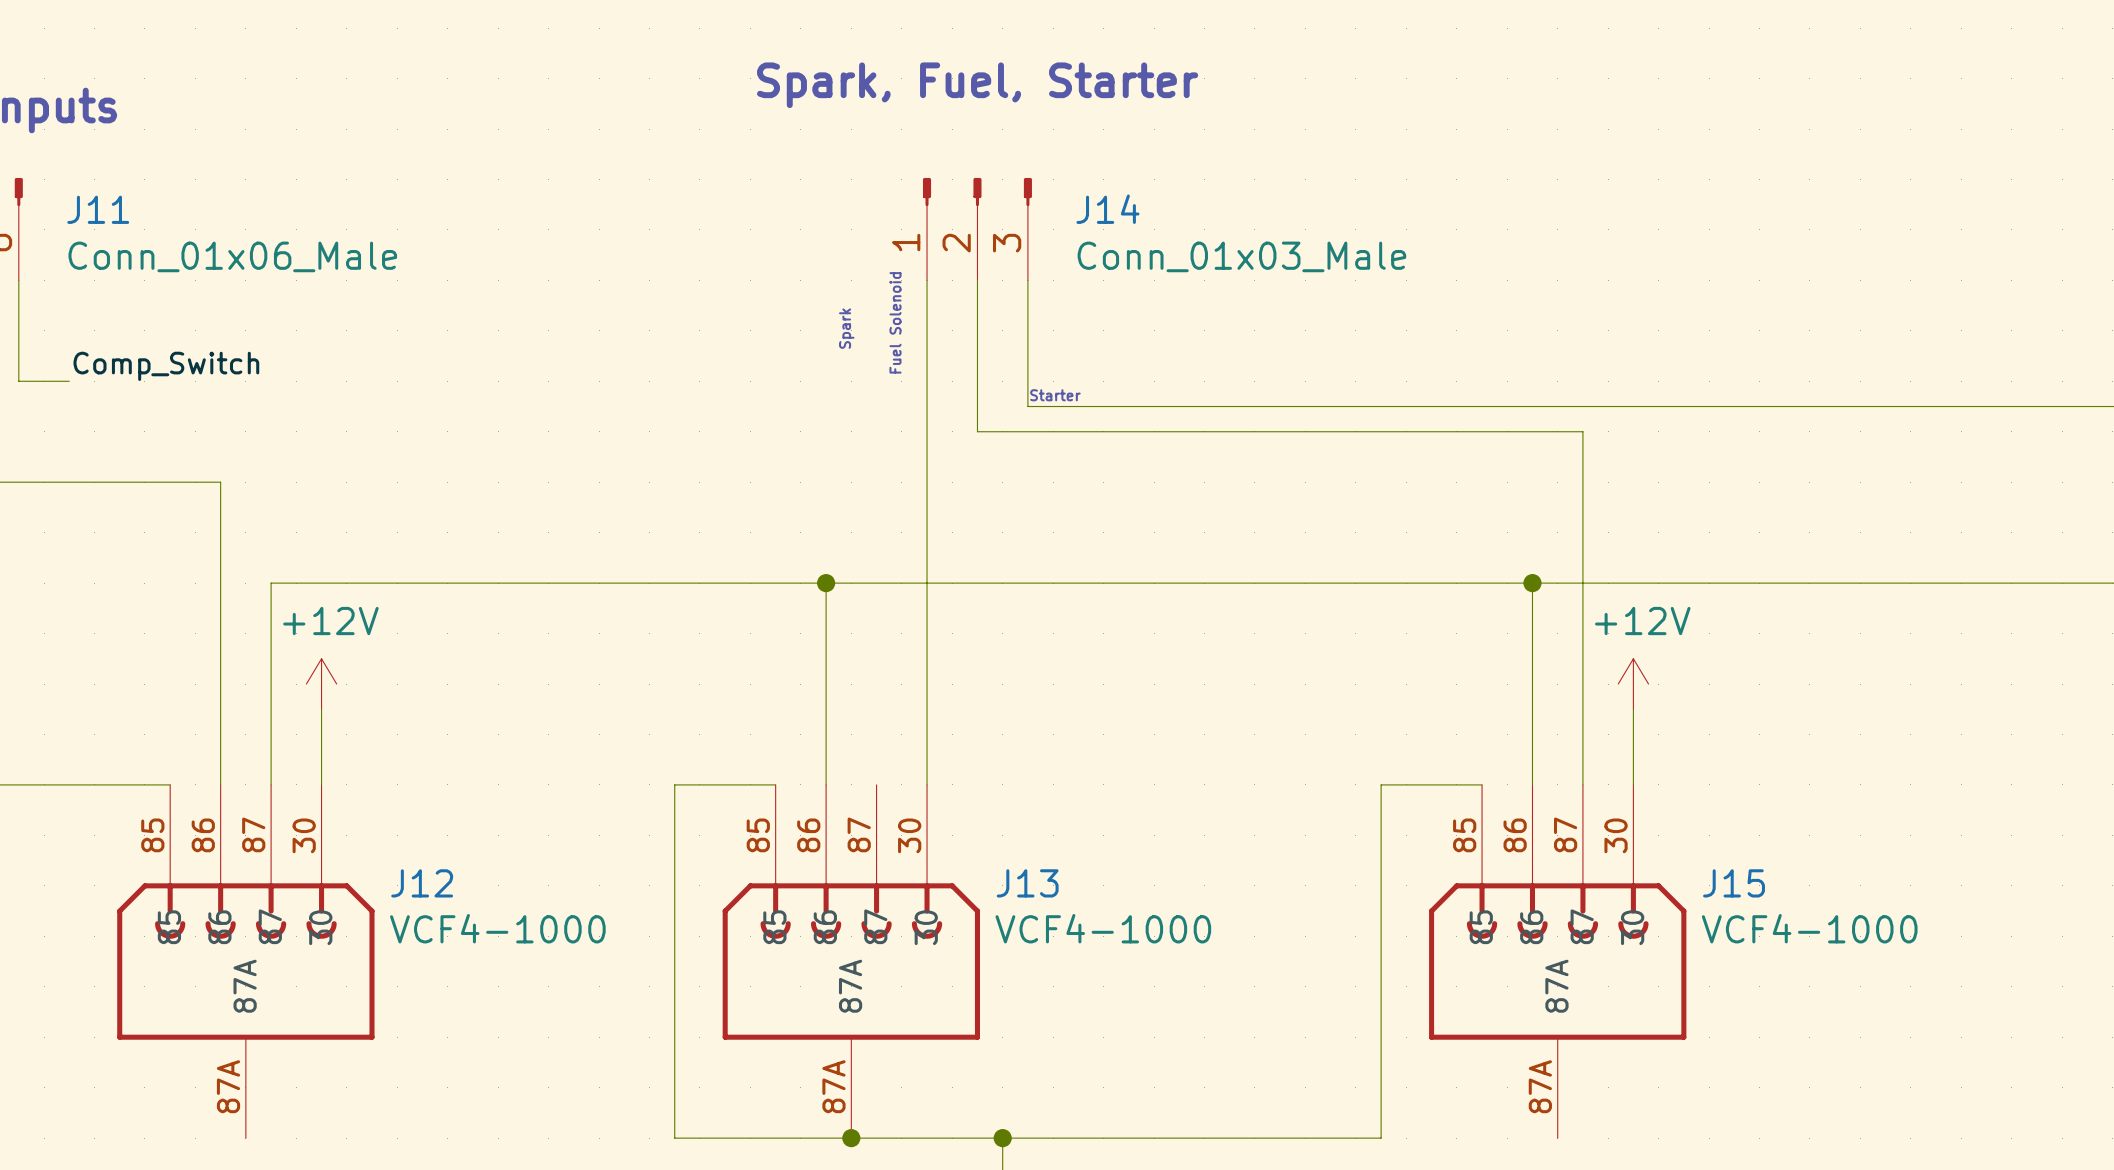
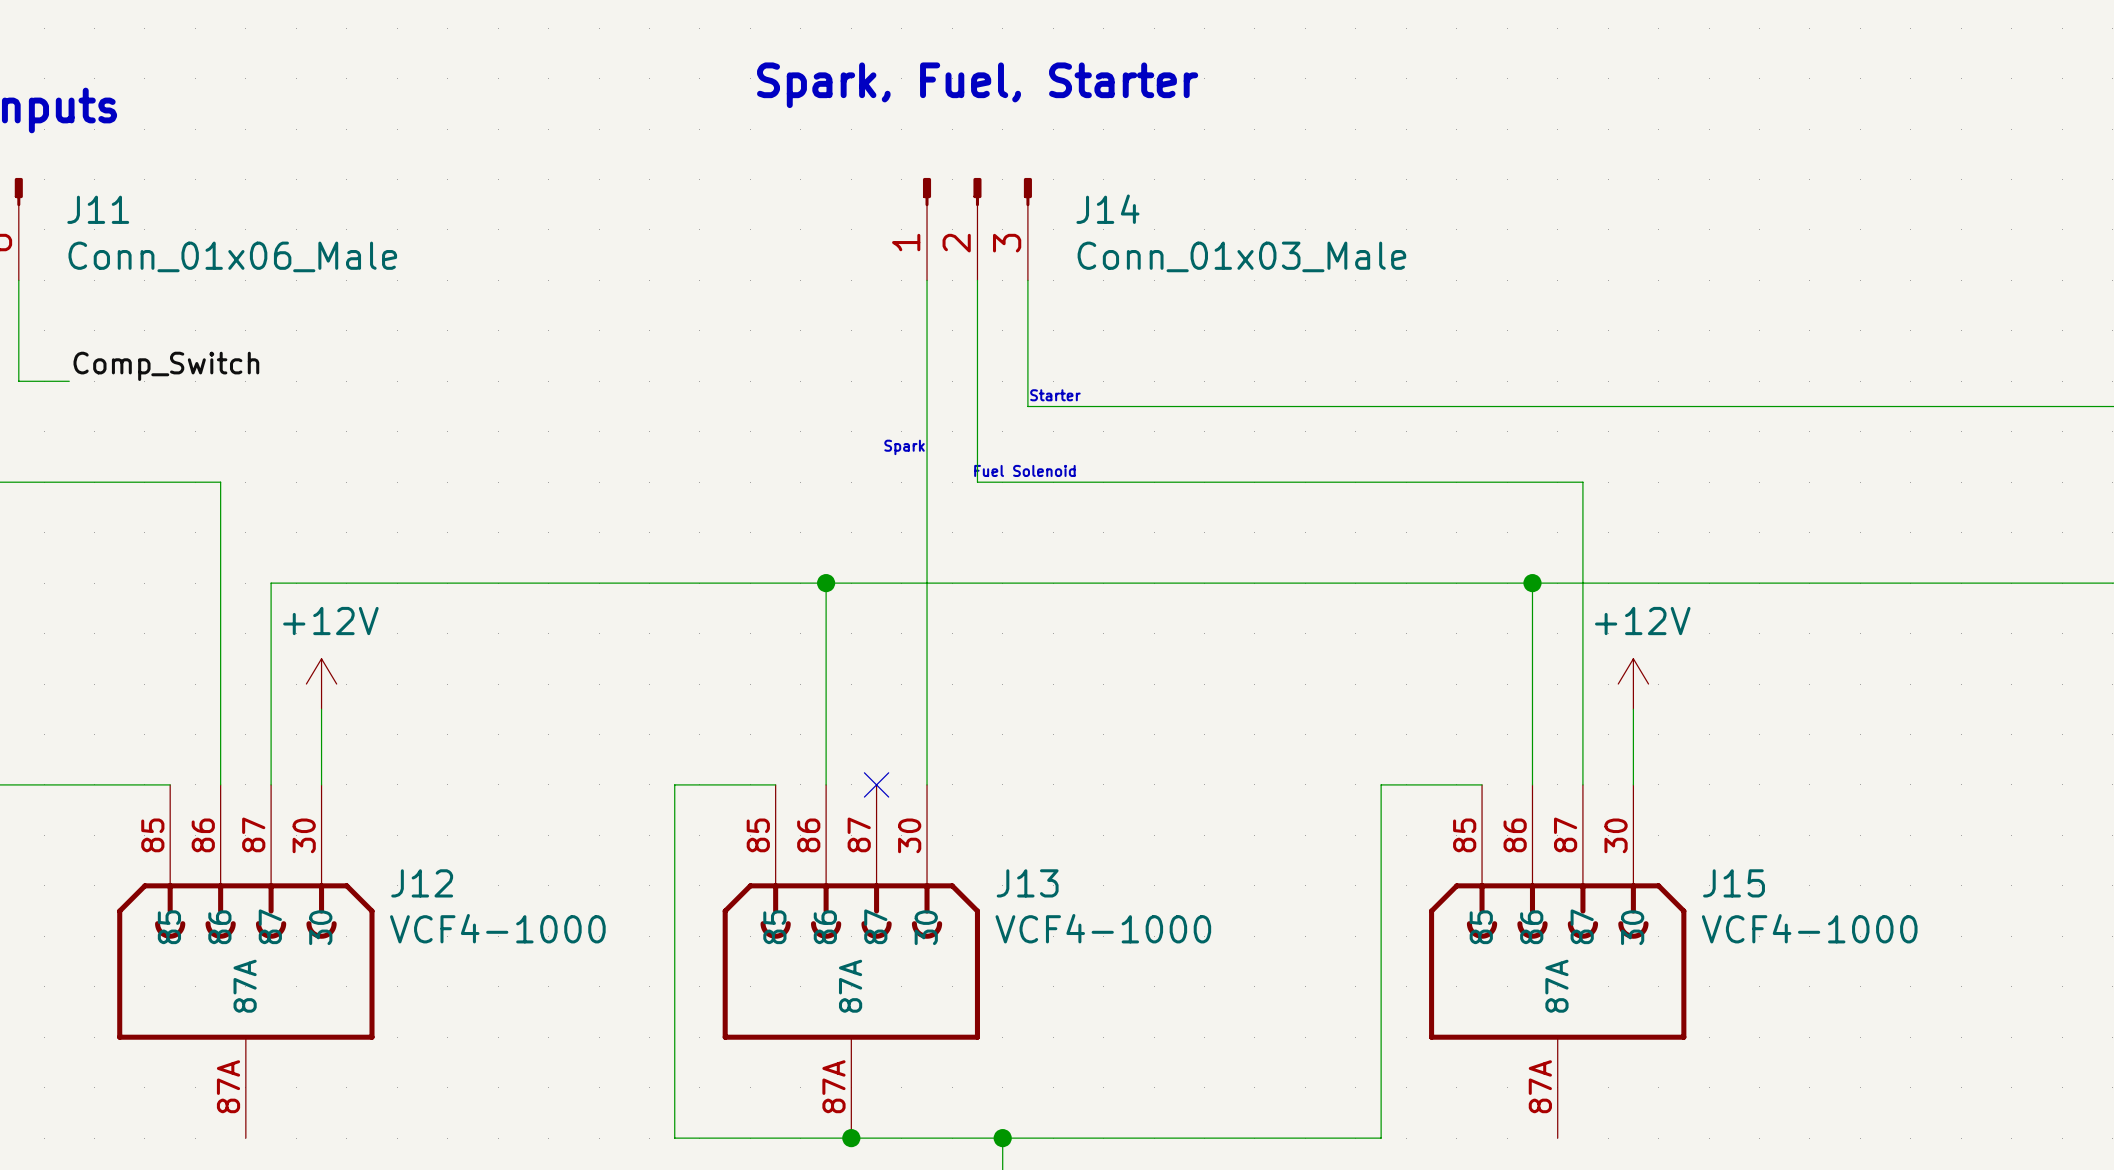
text rotation: 0° (895, 322) -> 90° clockwise (1024, 470)
text position: Fuel Solenoid (895, 322) -> Fuel Solenoid (1024, 470)
text rotation: 0° (846, 328) -> 90° clockwise (904, 447)
text position: Spark (846, 328) -> Spark (904, 447)
wire: (977, 431) (1582, 431) (1582, 482) -> (977, 431) (977, 482) (1582, 482)
no-connect mark: none -> (876, 784)

